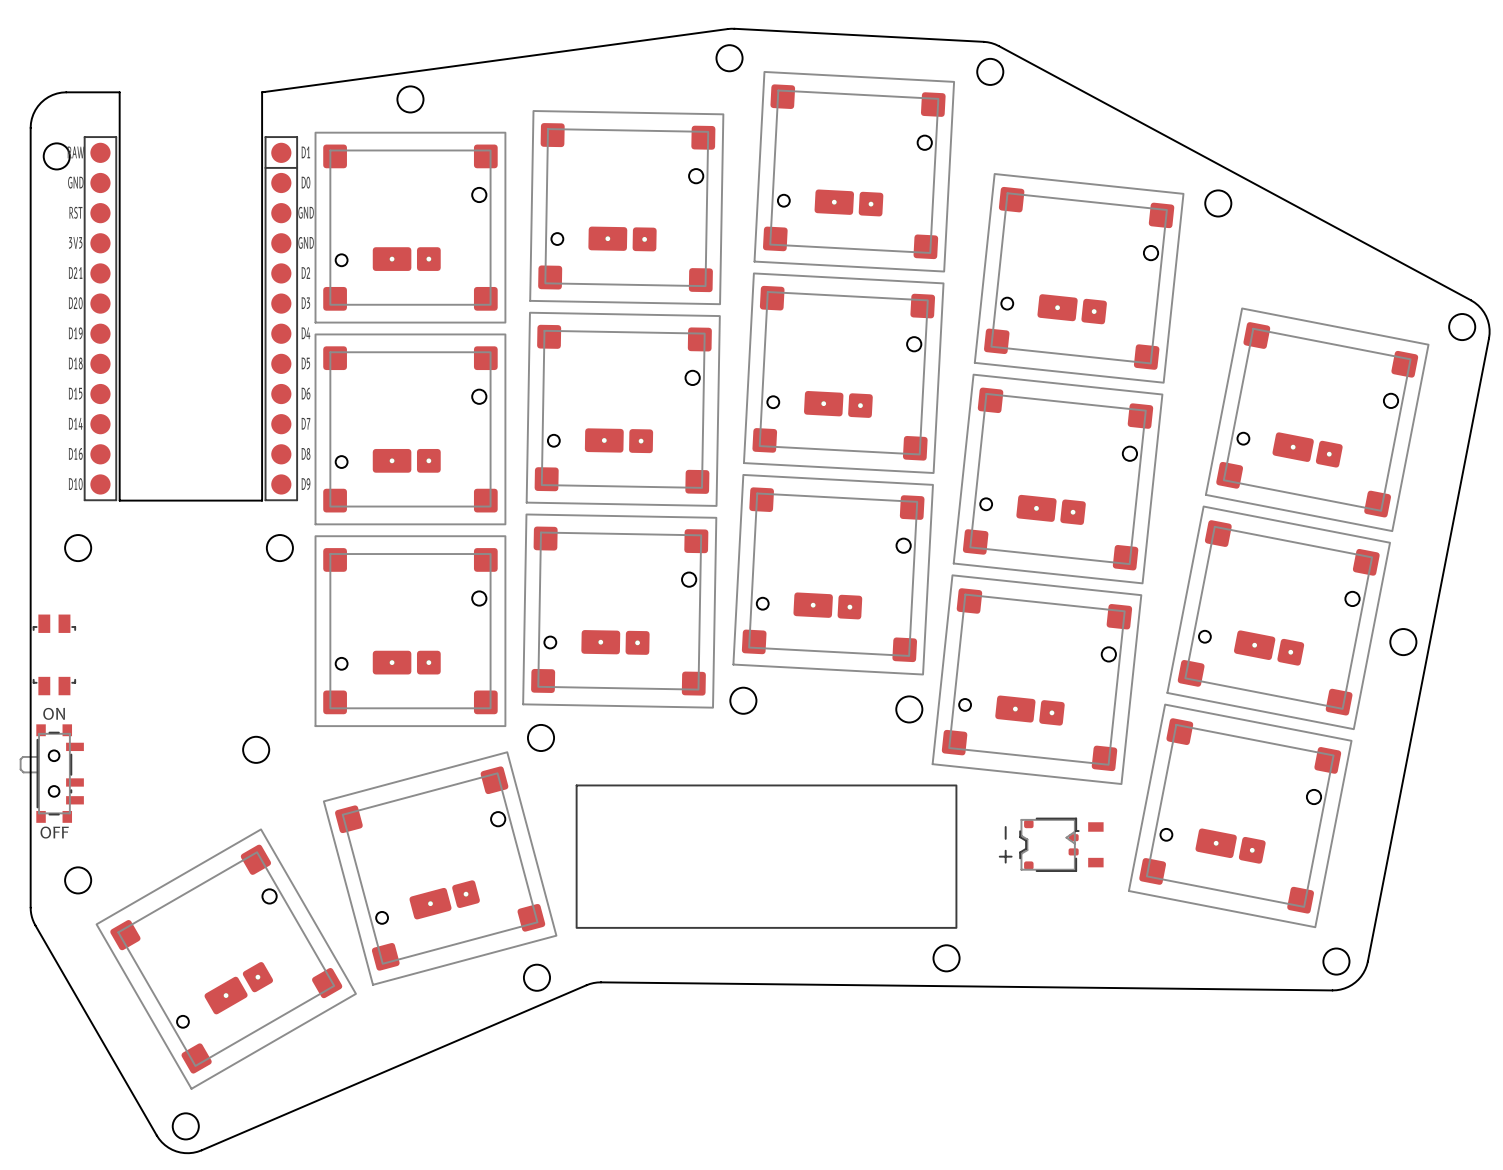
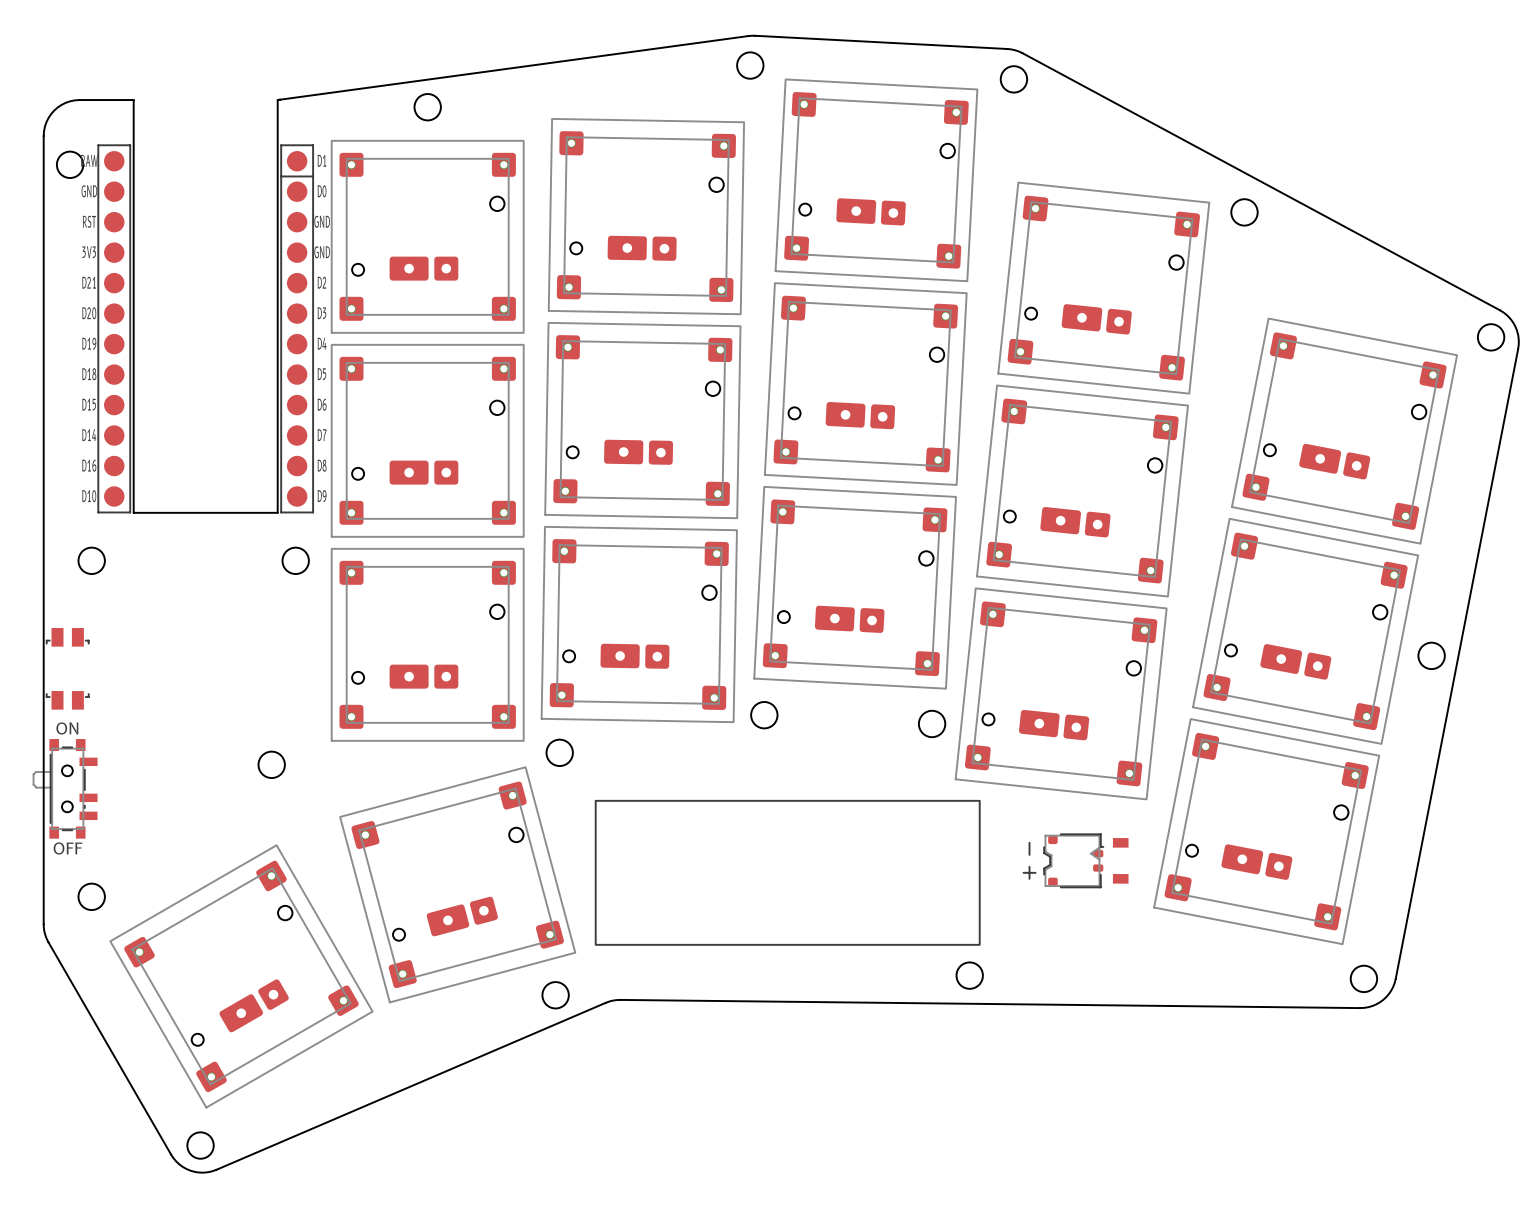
part footprint: [753, 71, 955, 273] -> [774, 78, 978, 282]
part footprint: [529, 110, 724, 305] -> [548, 118, 745, 315]
part footprint: [314, 132, 507, 324] -> [331, 140, 525, 334]
part footprint: [974, 173, 1185, 384] -> [997, 182, 1210, 395]
part footprint: [743, 272, 945, 474] -> [764, 282, 968, 486]
part footprint: [1205, 307, 1430, 532] -> [1231, 317, 1458, 545]
part footprint: [526, 312, 721, 507] -> [544, 322, 742, 519]
part footprint: [314, 333, 507, 525] -> [331, 344, 525, 538]
part footprint: [953, 374, 1164, 584] -> [976, 384, 1189, 598]
part footprint: [732, 474, 934, 676] -> [753, 486, 957, 690]
part footprint: [1166, 505, 1391, 730] -> [1192, 518, 1419, 745]
part footprint: [522, 513, 717, 709] -> [541, 526, 738, 723]
part footprint: [314, 535, 507, 727] -> [331, 548, 525, 742]
part footprint: [932, 574, 1142, 785] -> [955, 587, 1168, 801]
part footprint: [1128, 703, 1353, 928] -> [1153, 718, 1380, 945]
part footprint: [323, 751, 558, 986] -> [339, 766, 576, 1004]
part footprint: [95, 828, 357, 1090] -> [109, 844, 374, 1109]

